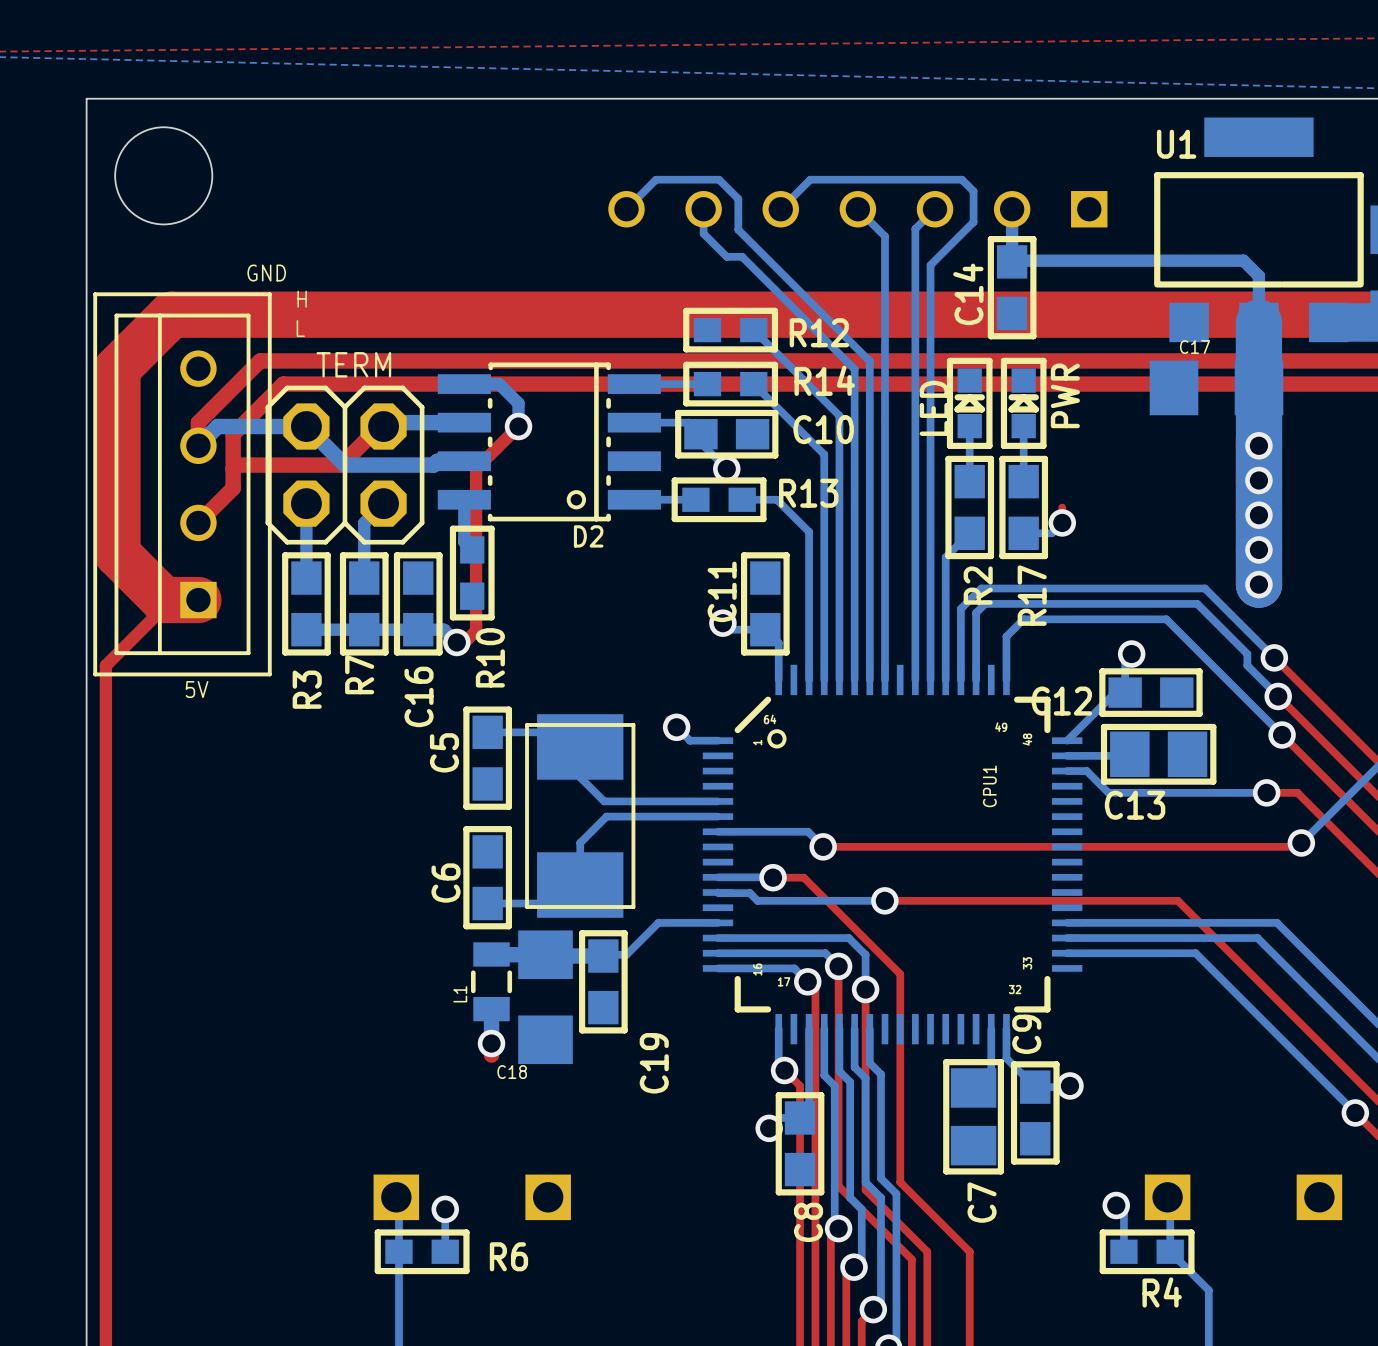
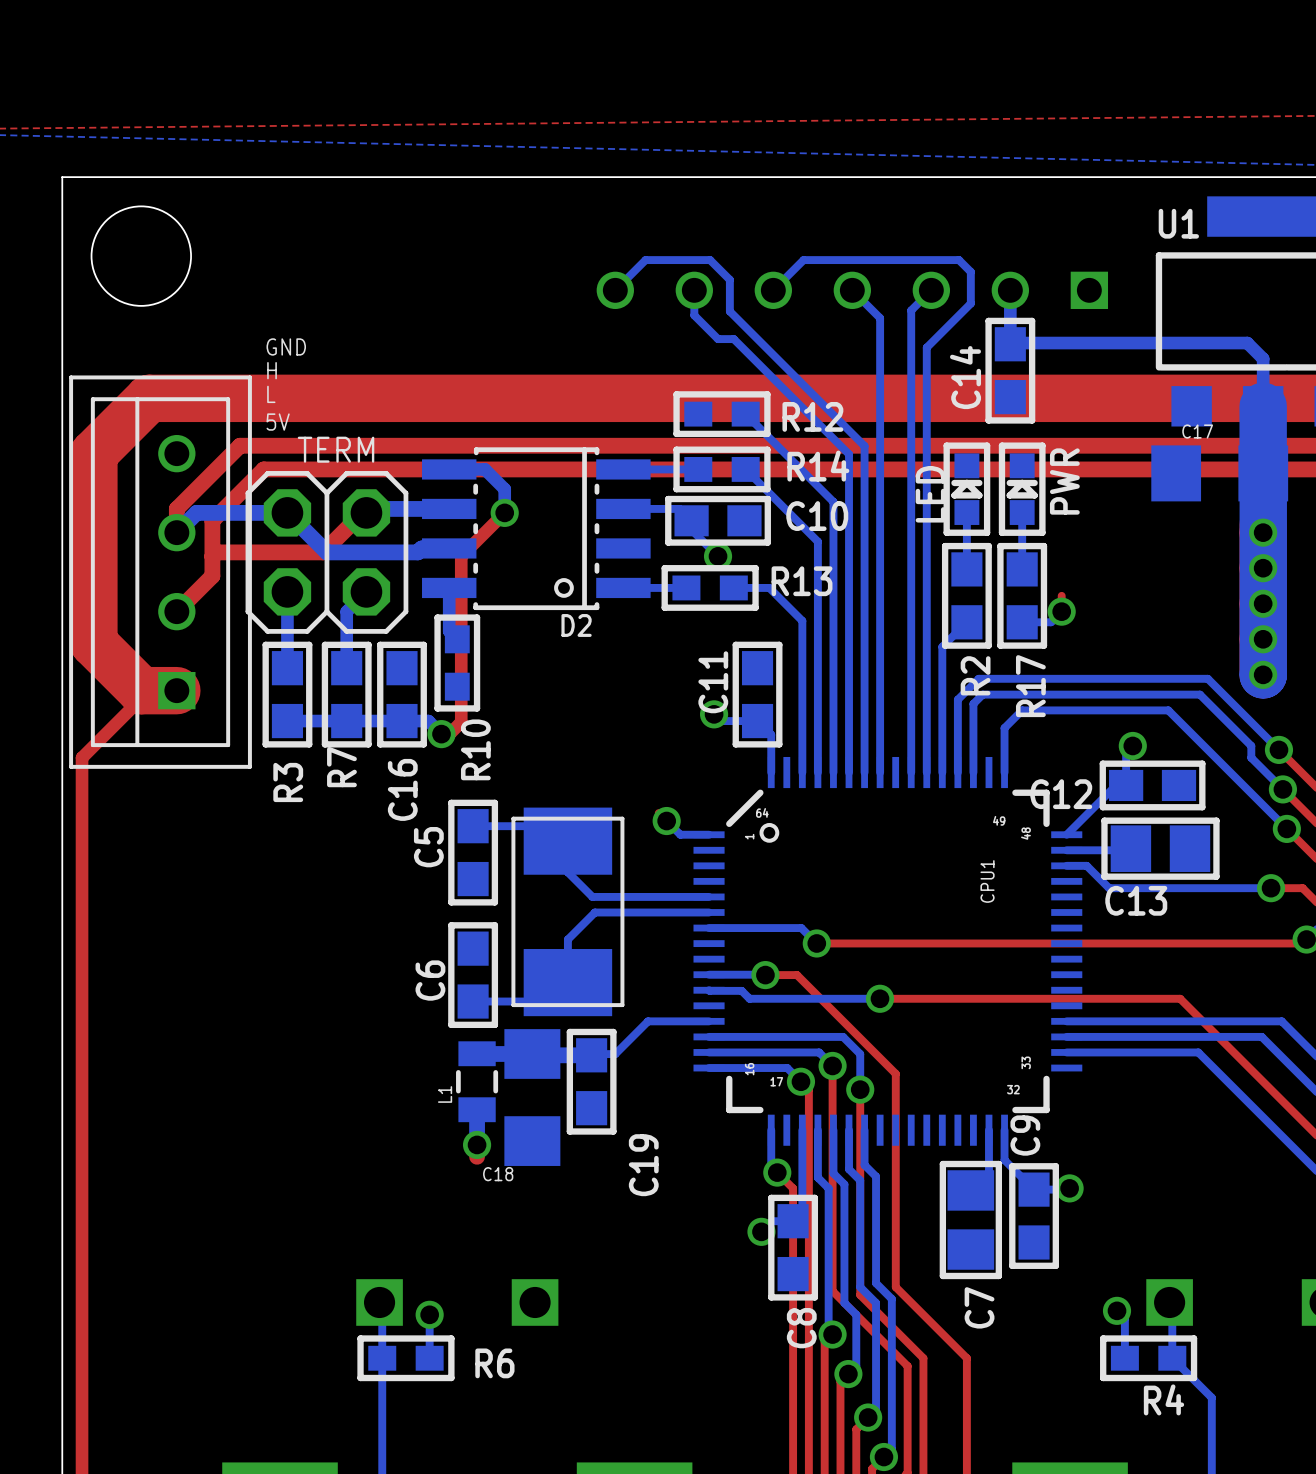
text position: GND (266, 273) -> GND (286, 346)
text position: H (302, 299) -> H (272, 370)
text position: L (300, 328) -> L (271, 394)
text position: 5V (197, 689) -> 5V (278, 422)

